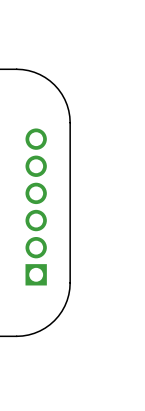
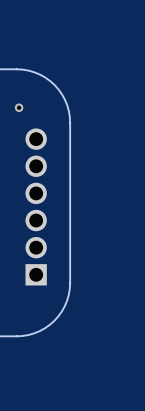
via: none -> (19, 107)

